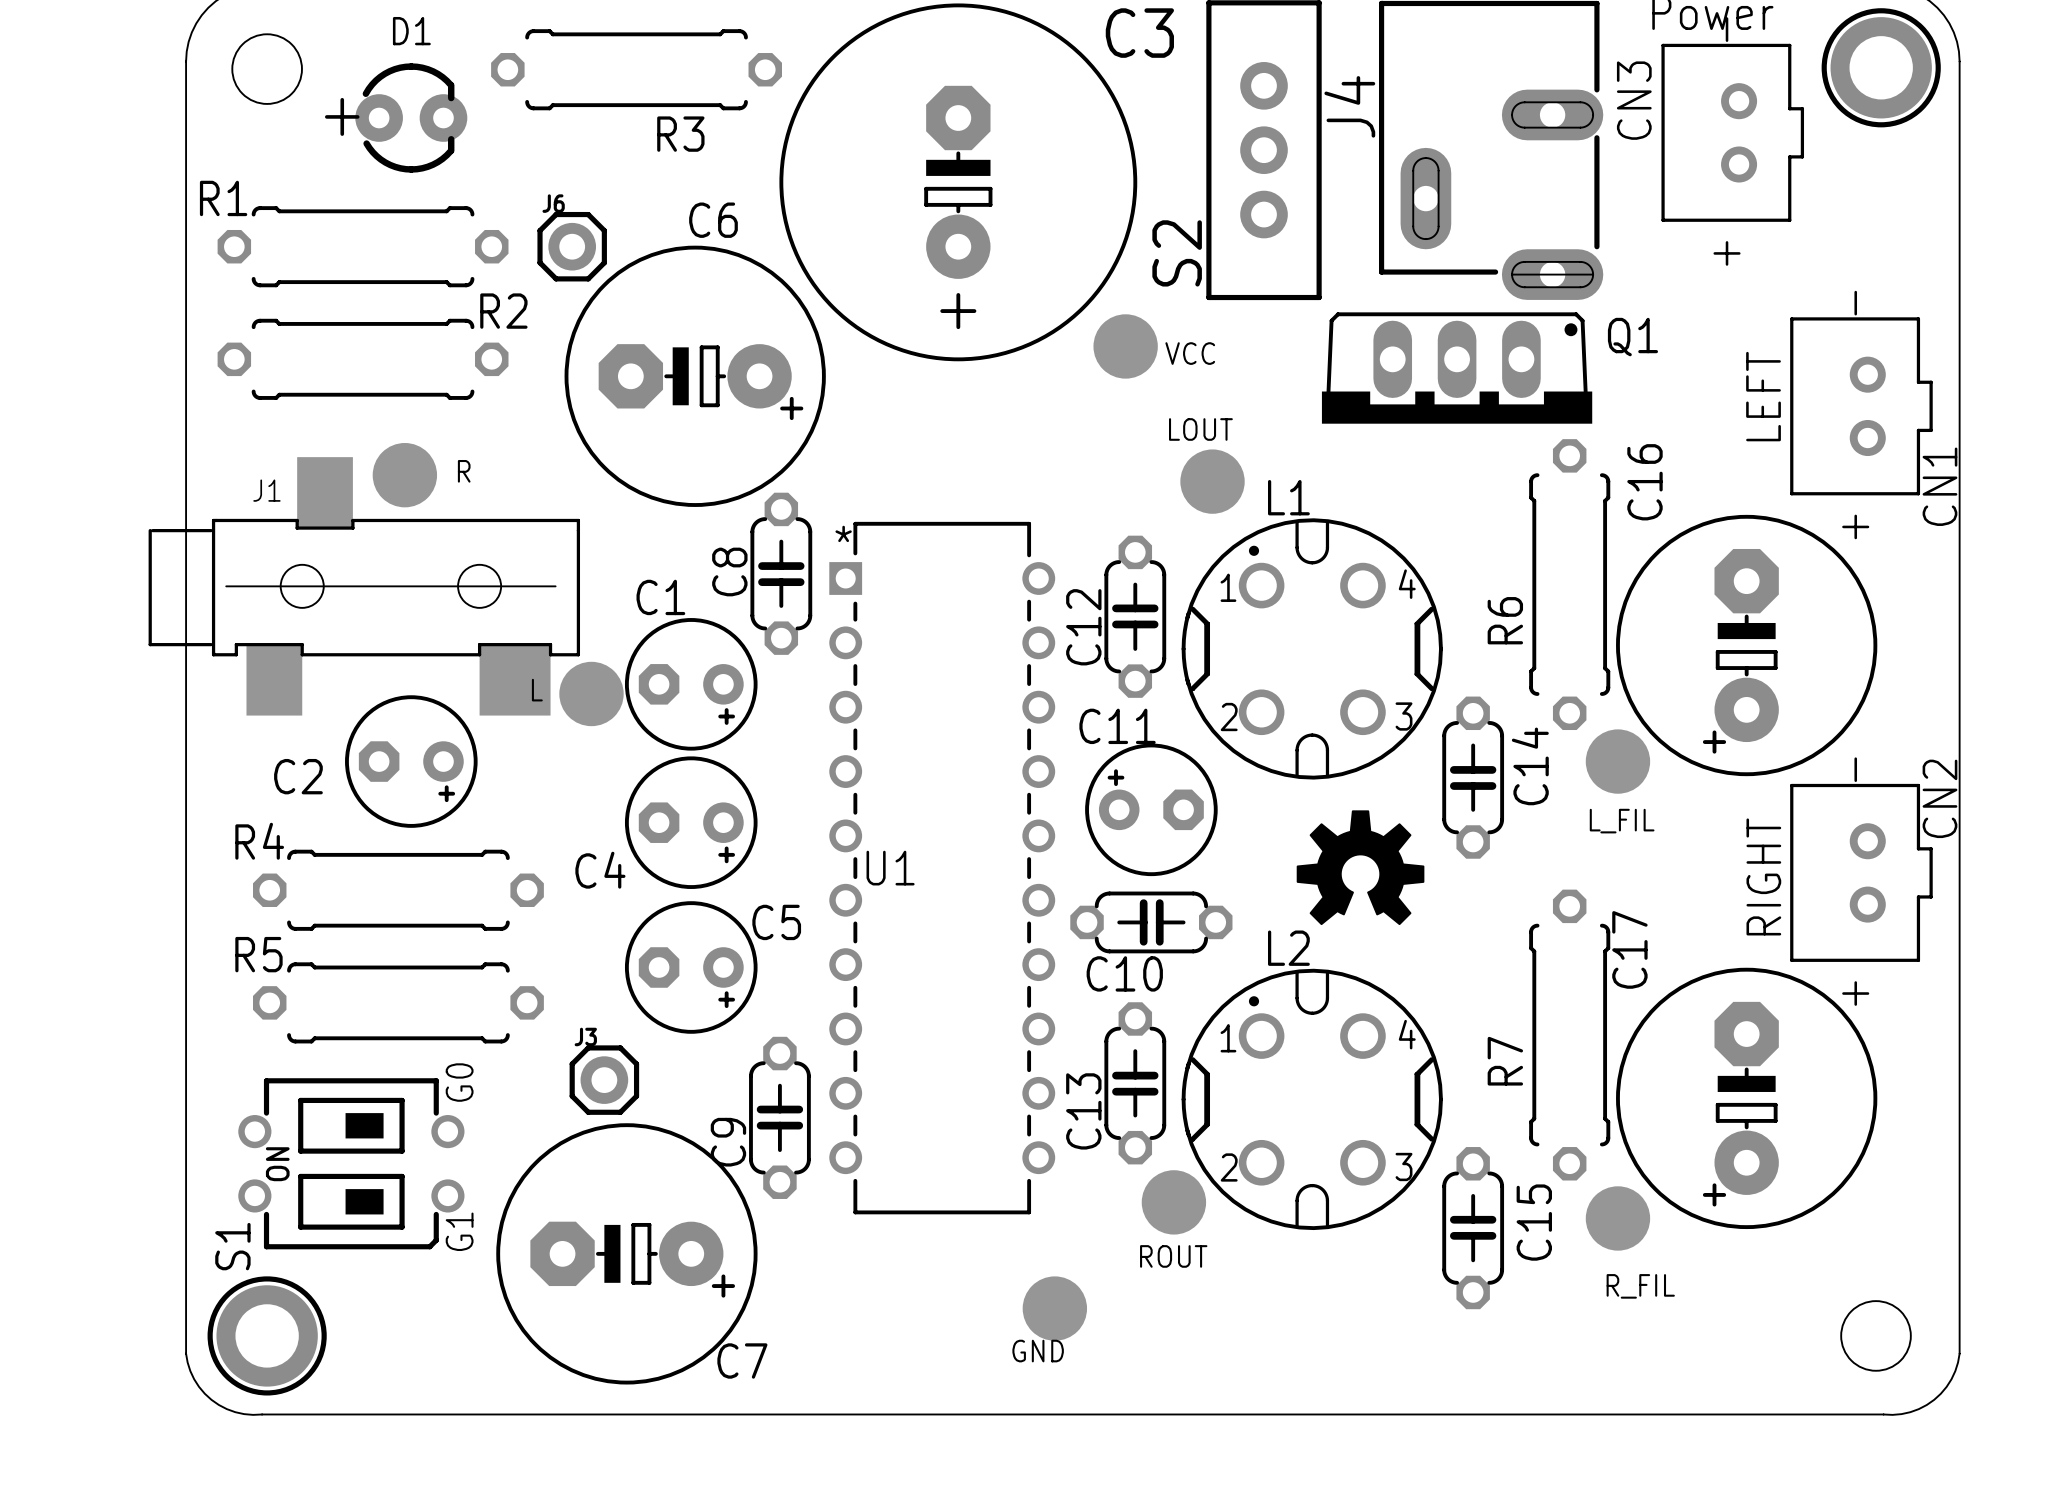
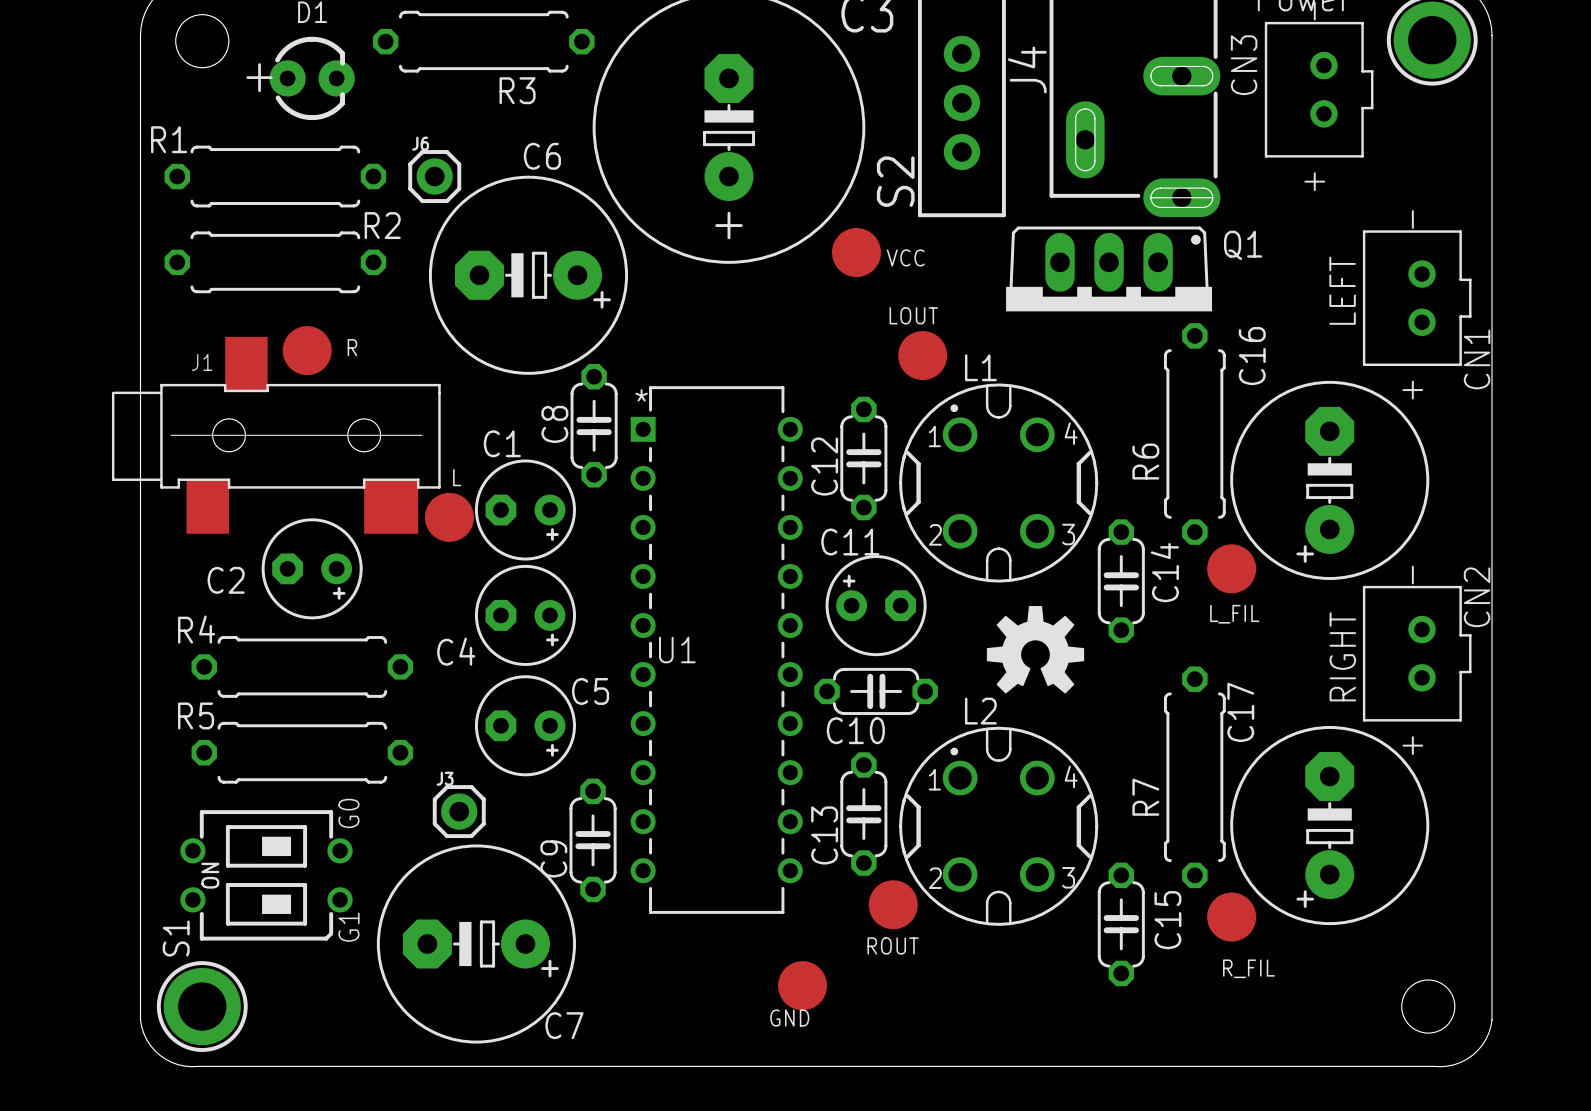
L name position: L (537, 690) -> L (457, 477)

